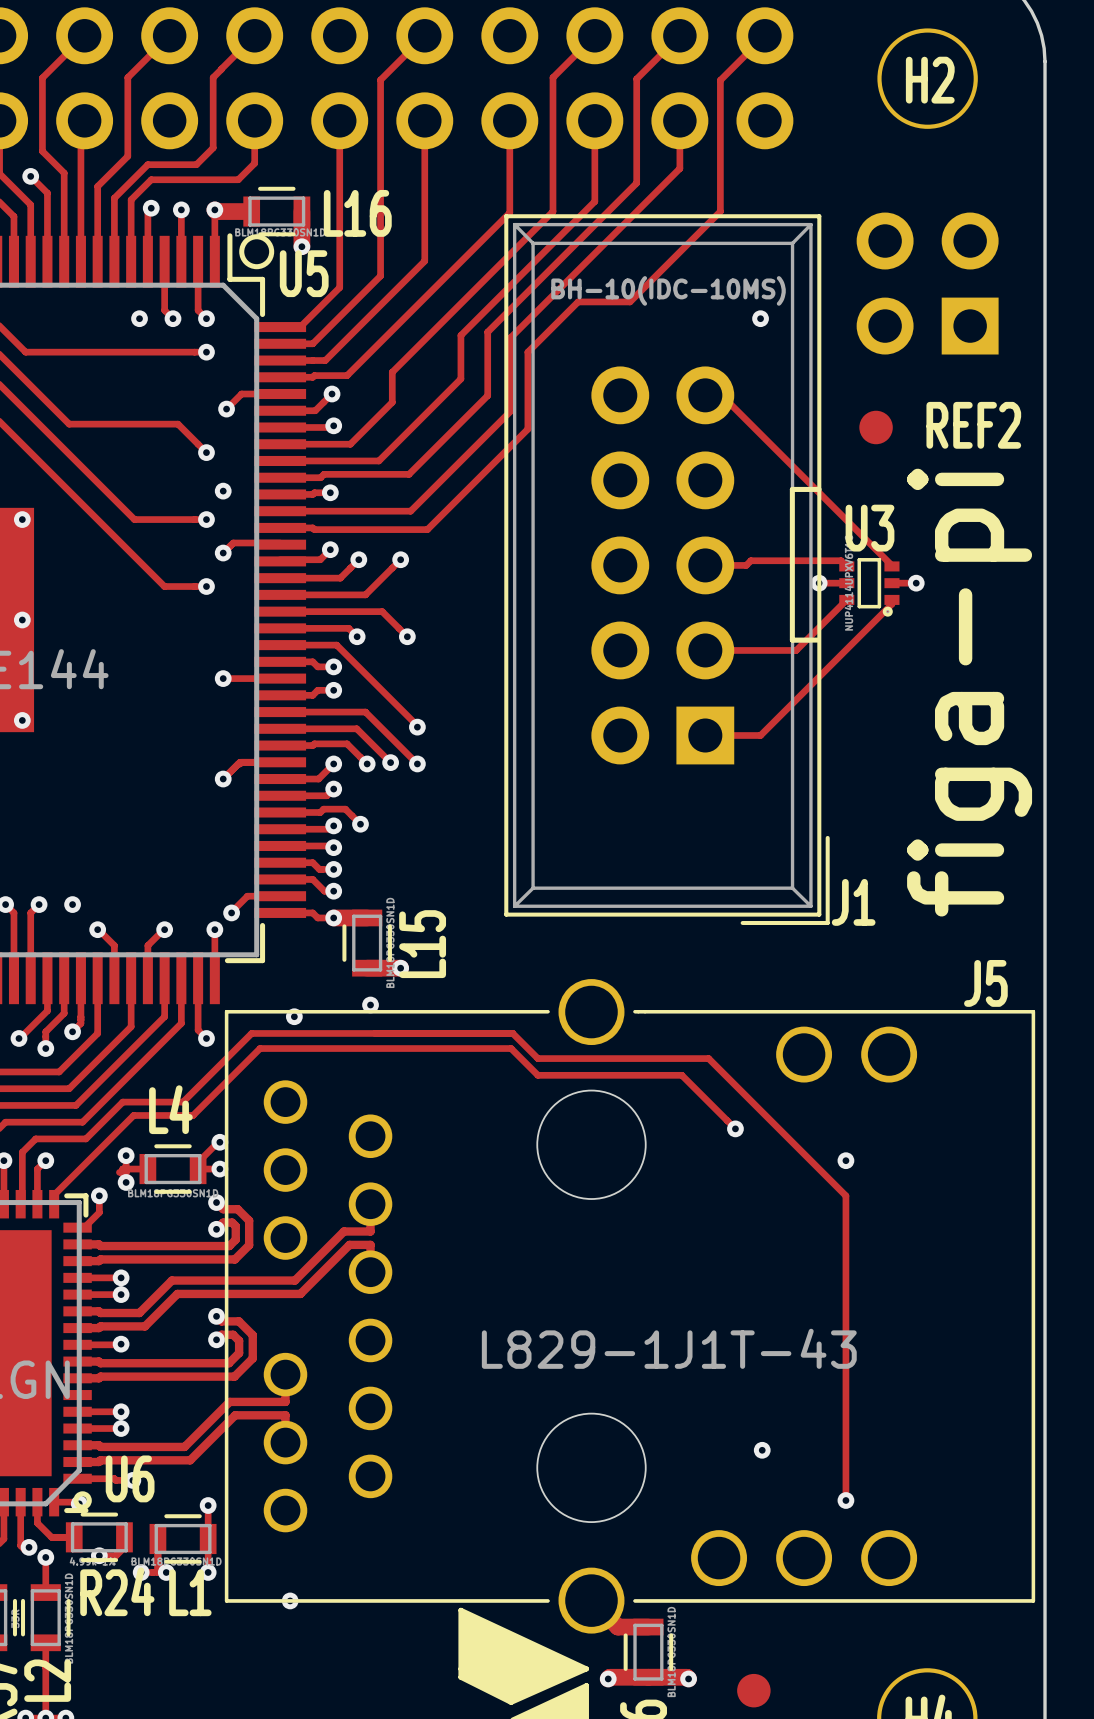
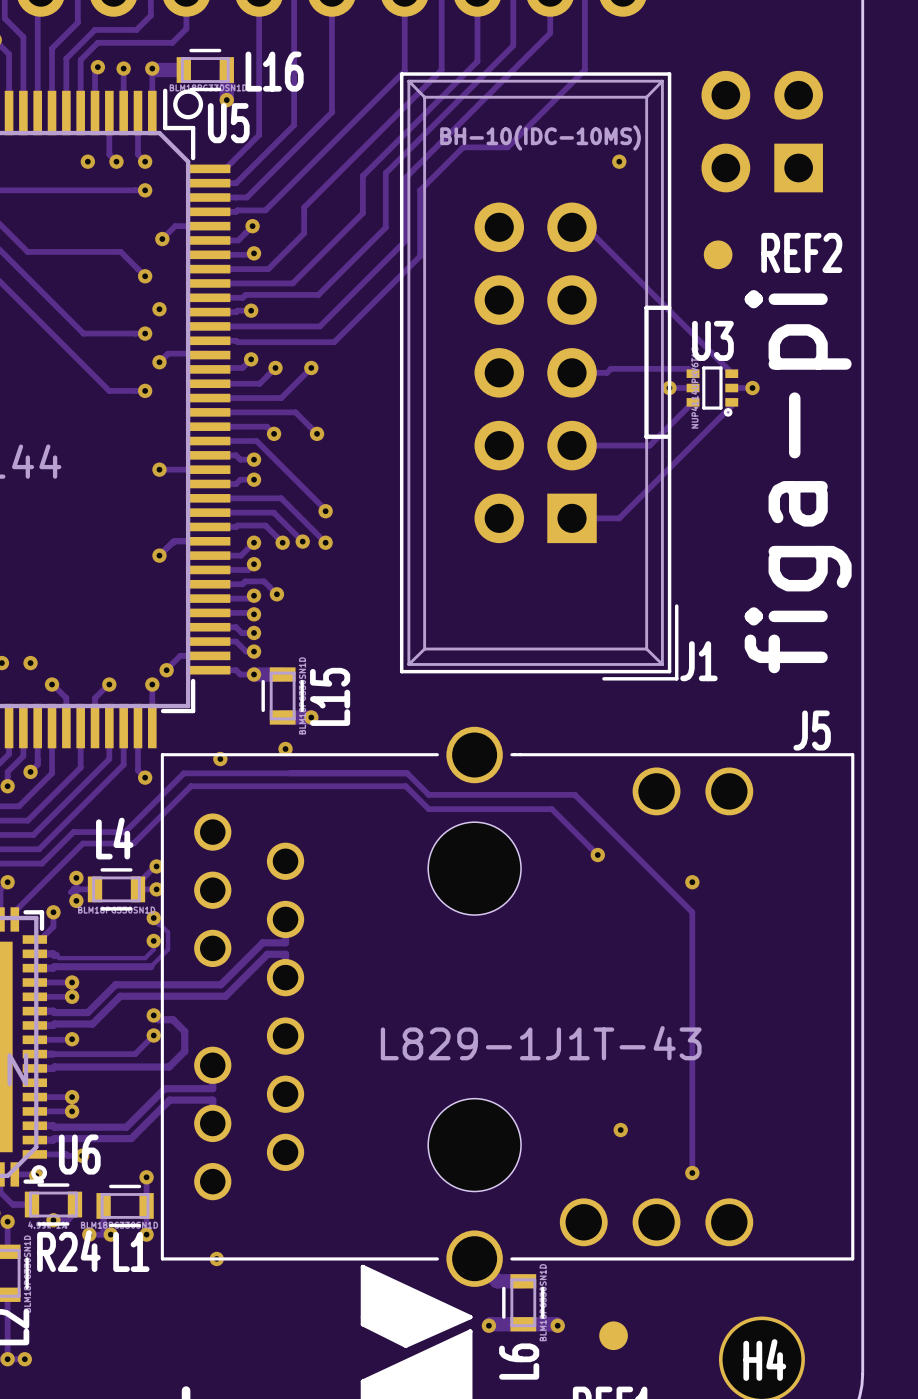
track: (223, 1209) (237, 1209) (249, 1220) (249, 1245) (234, 1259) (213, 1259) -> (159, 923) (168, 932) (168, 949) (150, 966)
track: (216, 1229) (223, 1222) (232, 1222) (235, 1226) (235, 1239) (229, 1246) (102, 1246) -> (153, 940) (153, 949) (145, 958) (59, 958) (56, 955)
track: (216, 1339) (221, 1334) (233, 1334) (239, 1340) (239, 1353) (228, 1363) (100, 1363) (98, 1361) -> (153, 1035) (135, 1054) (53, 1054)

